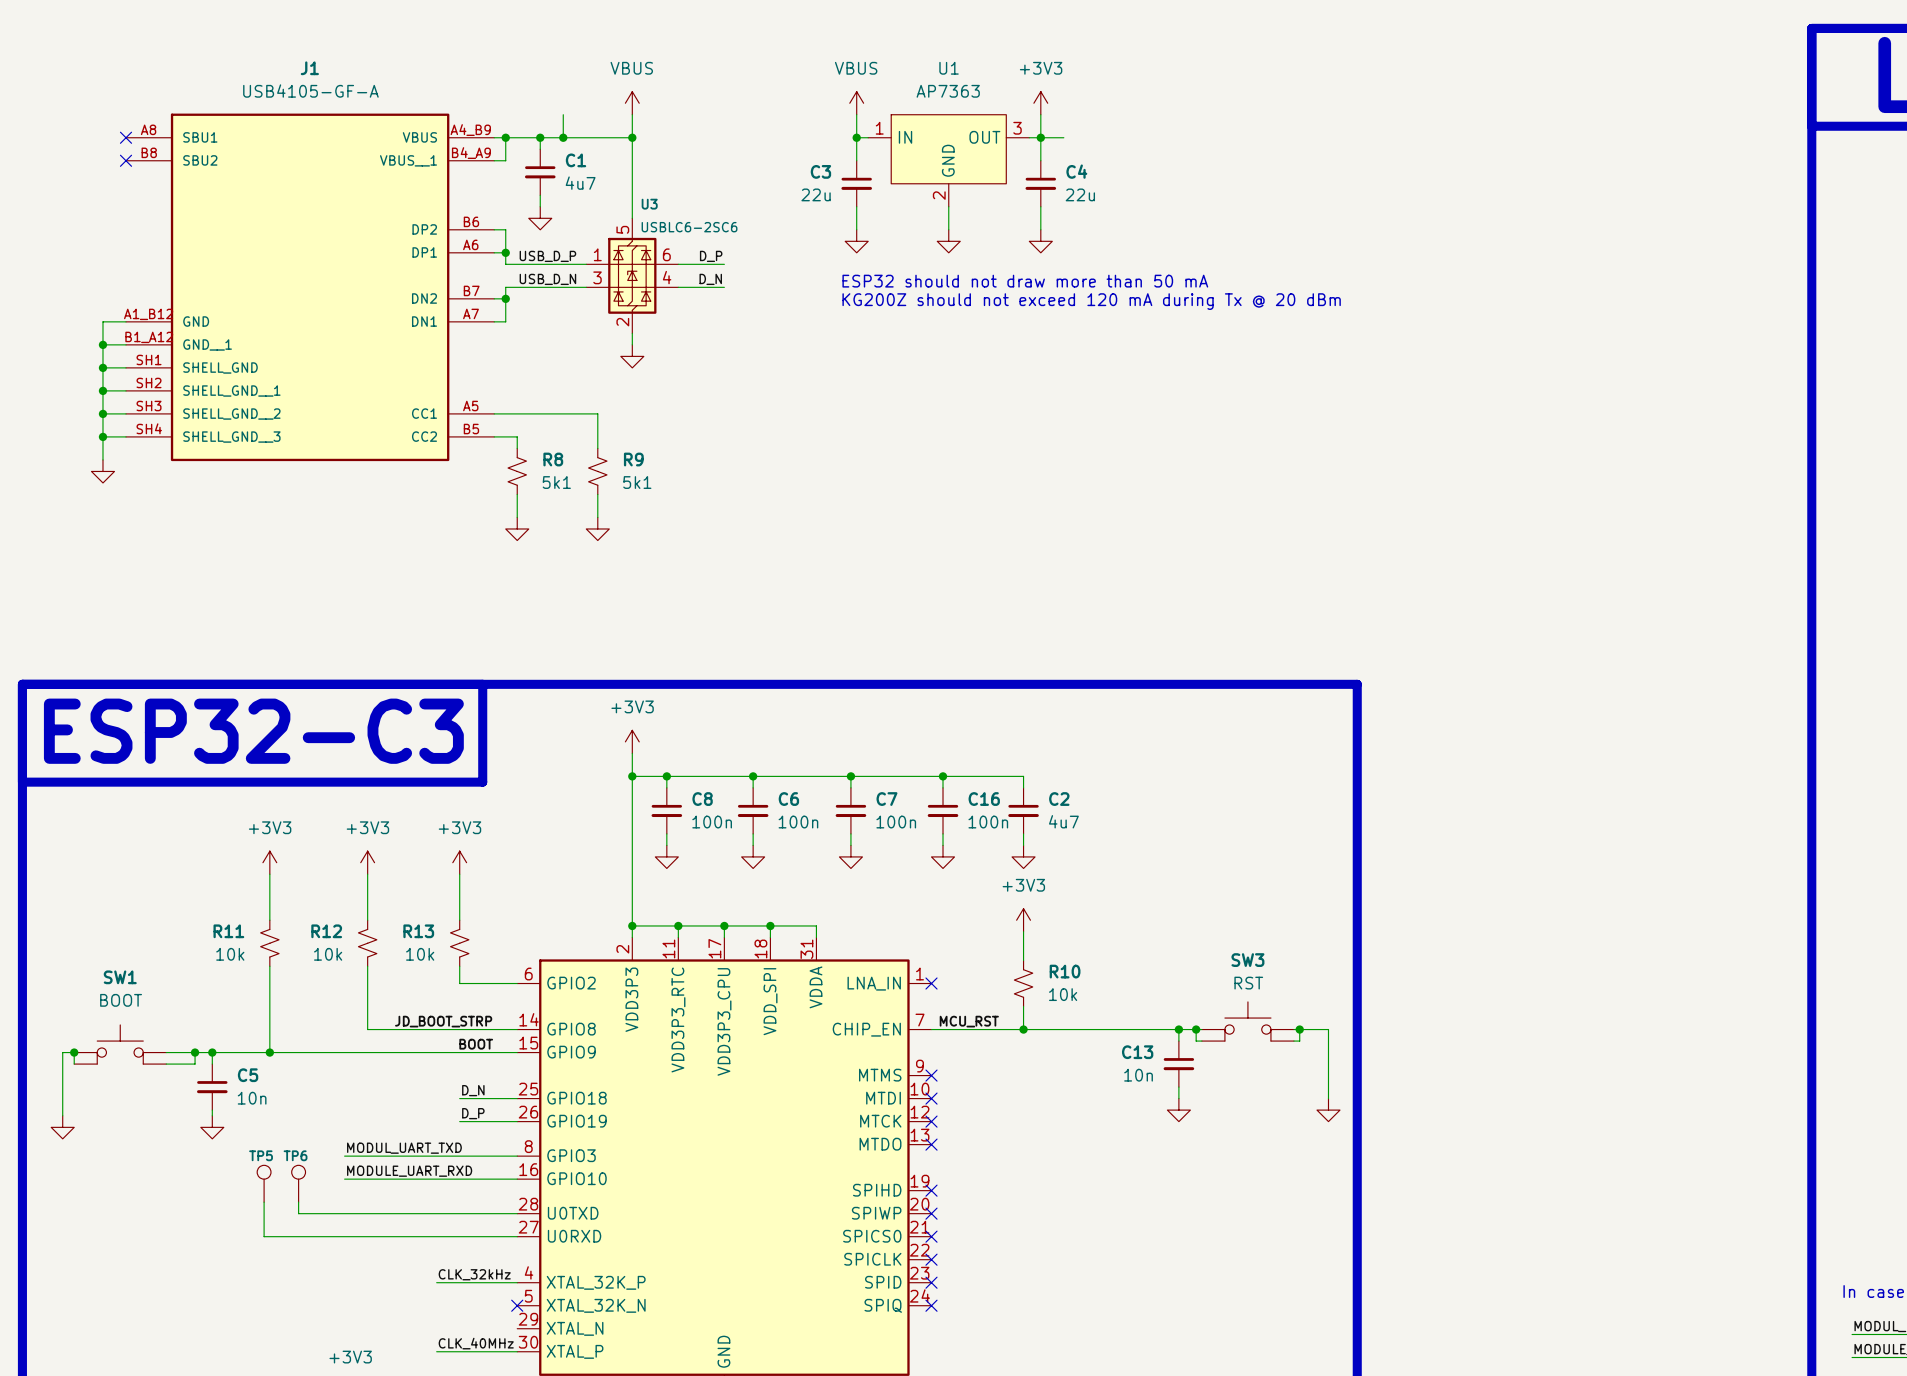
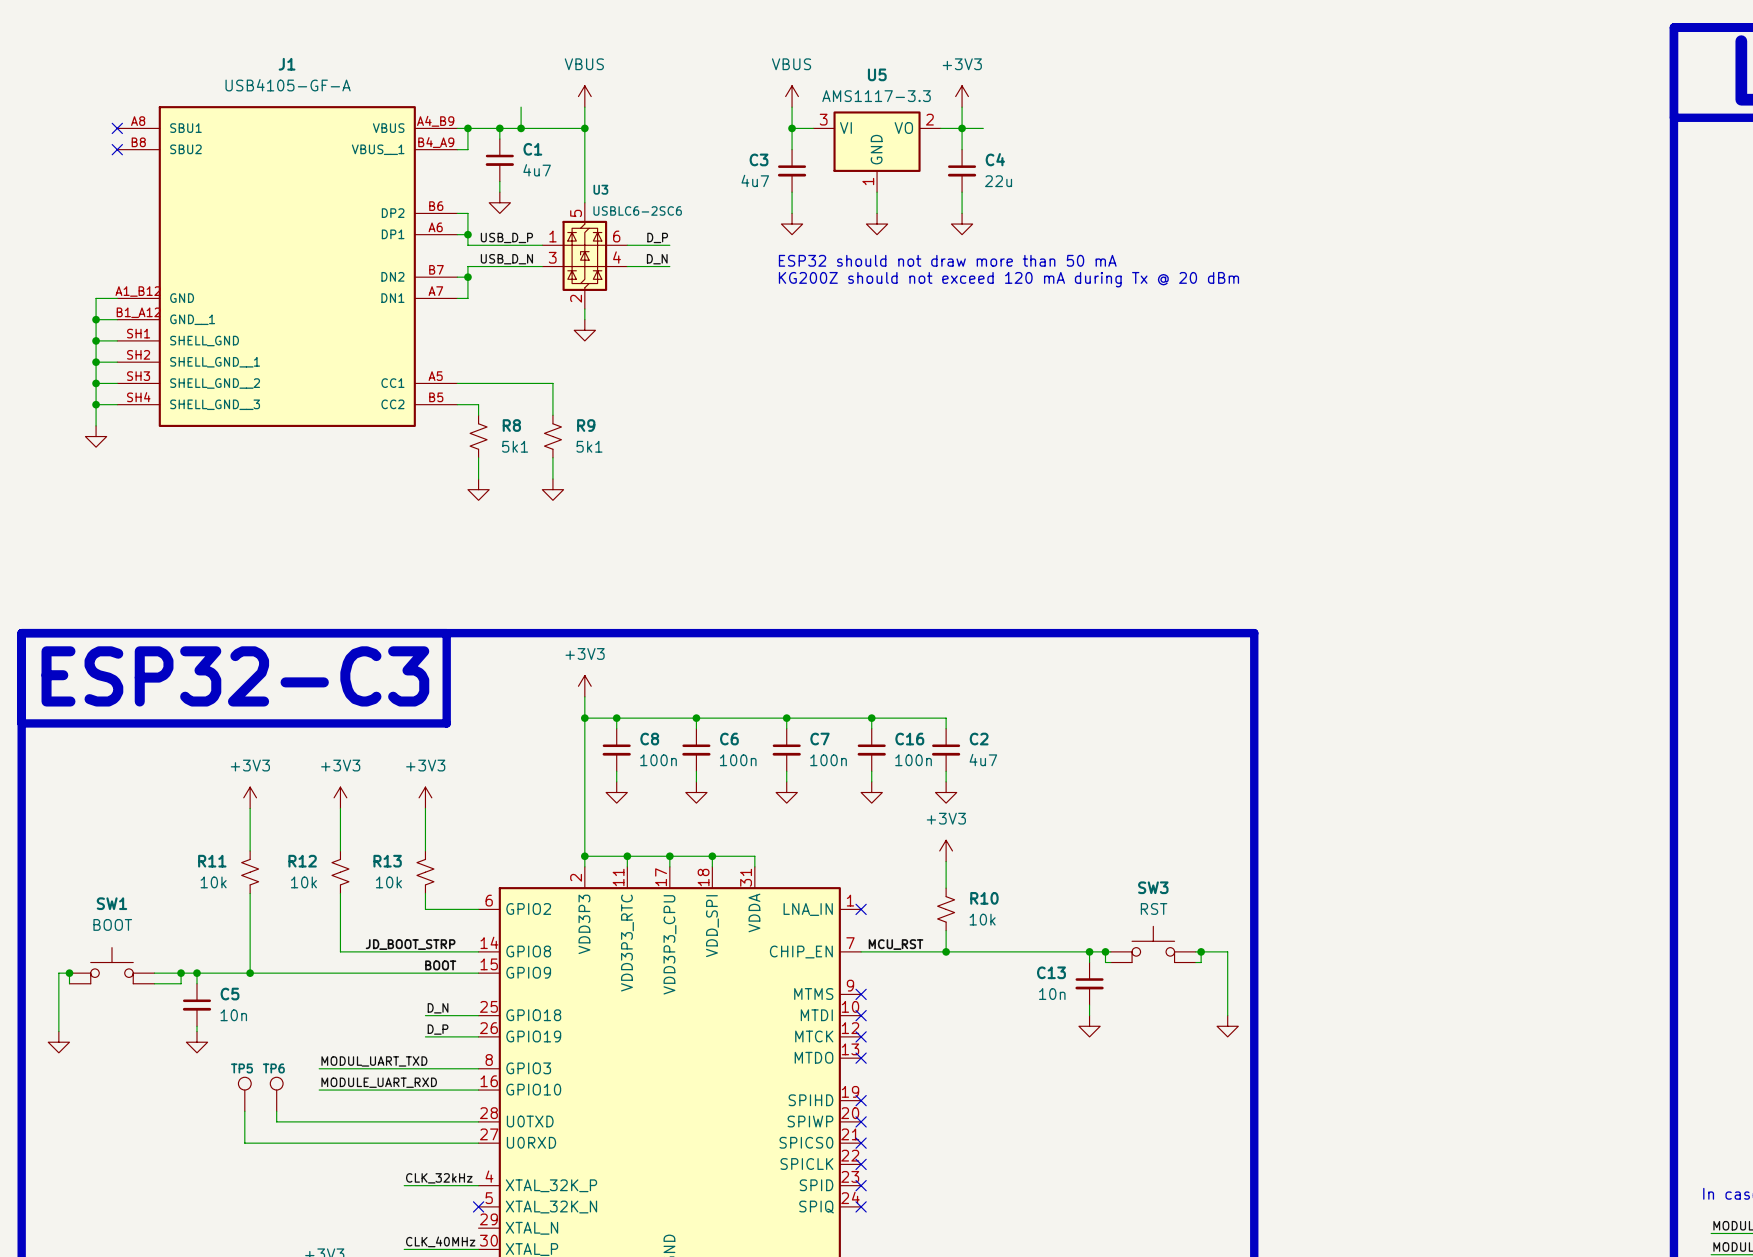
U1: AP7363 (948, 160) -> none
U5: none -> AMS1117-3.3 (877, 151)
C3 value: 22u (816, 194) -> 4u7 (755, 180)

